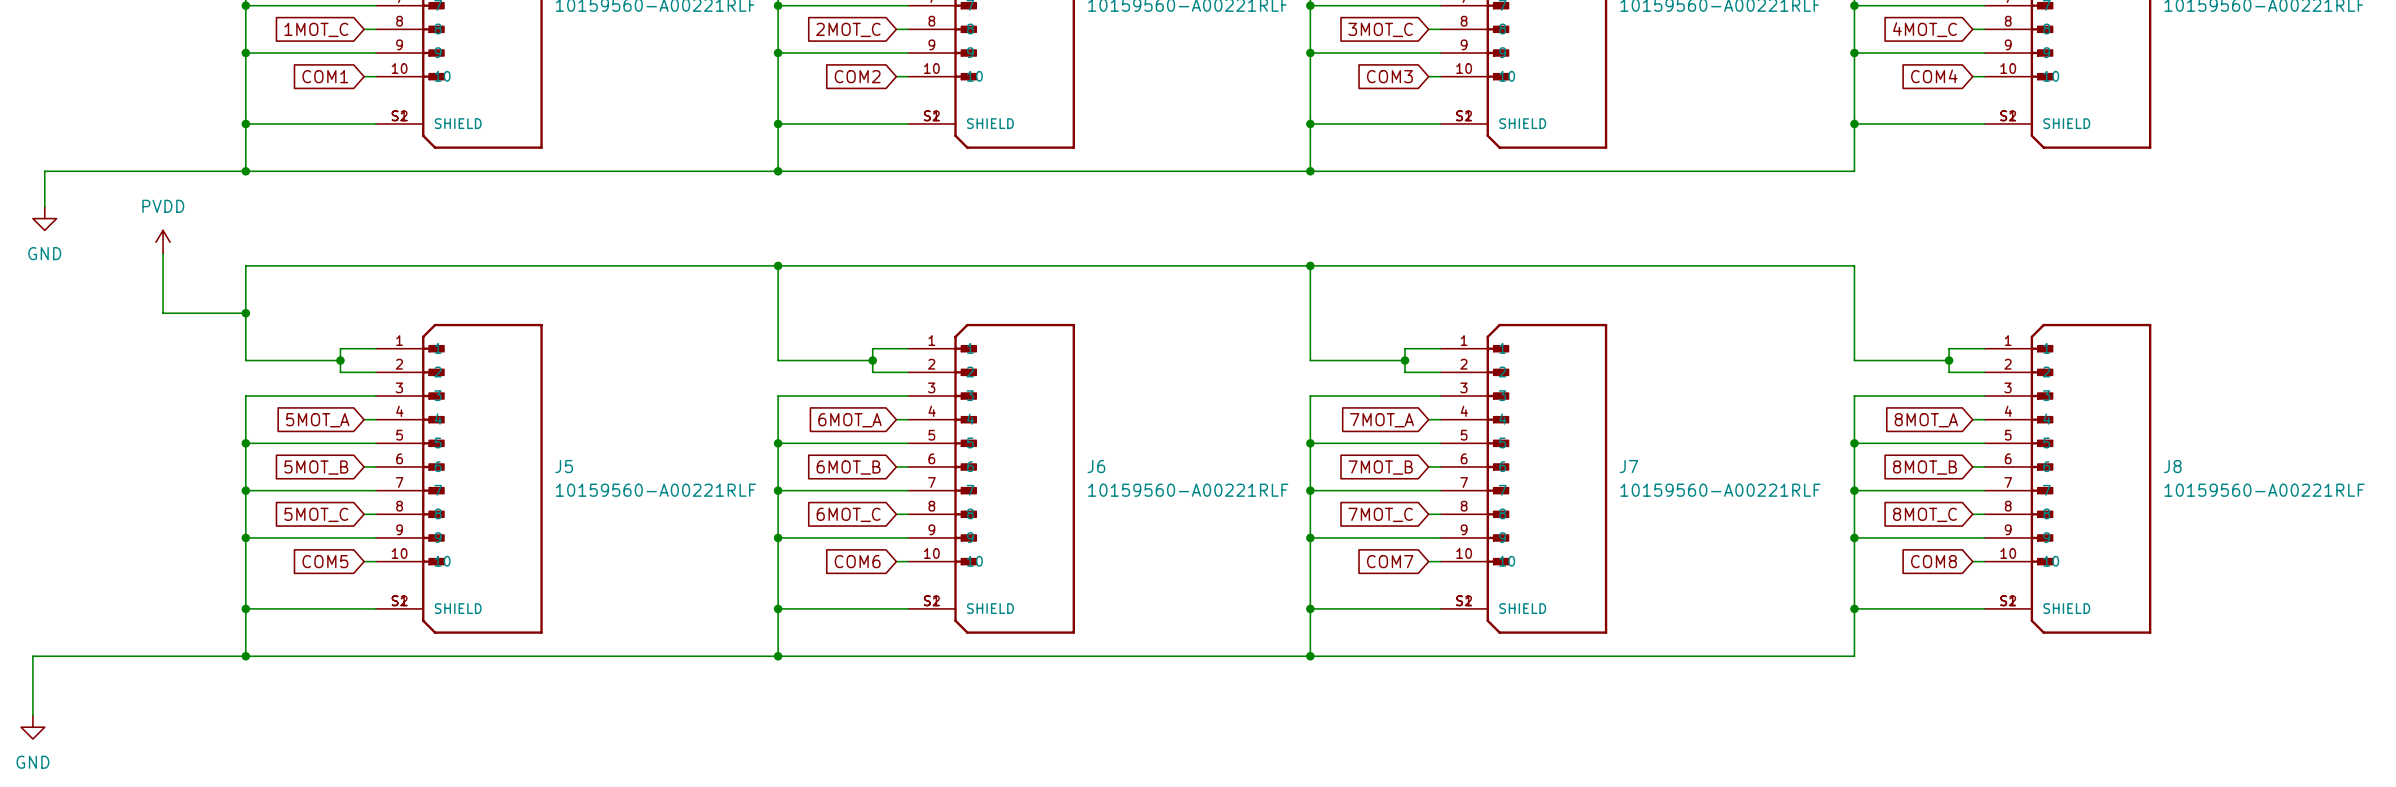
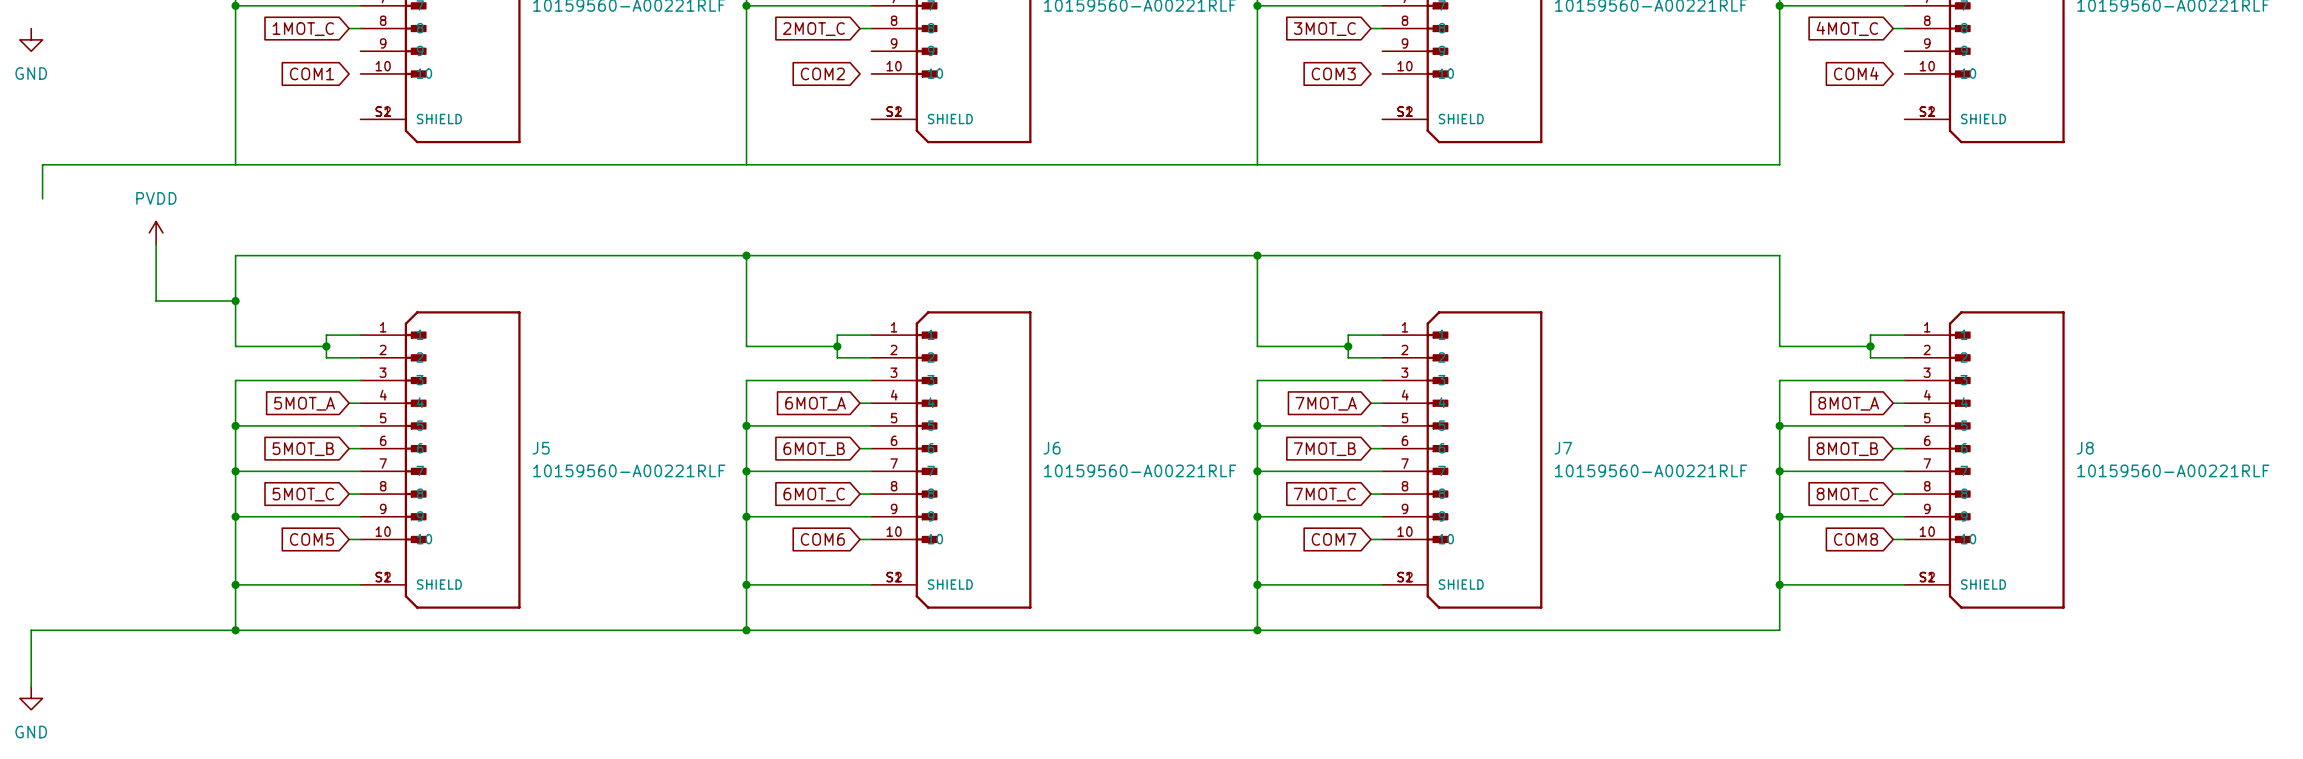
wire: (245, 53) (375, 53) -> none
junction: (245, 53) -> none
wire: (778, 53) (908, 53) -> none
junction: (778, 53) -> none
wire: (1310, 53) (1440, 53) -> none
junction: (1310, 53) -> none
wire: (1854, 53) (1984, 53) -> none
junction: (1854, 53) -> none
wire: (364, 76) (375, 76) -> none
wire: (896, 76) (908, 76) -> none
wire: (1428, 76) (1440, 76) -> none
wire: (1972, 76) (1984, 76) -> none
wire: (245, 123) (375, 123) -> none
junction: (245, 123) -> none
wire: (778, 123) (908, 123) -> none
junction: (778, 123) -> none
wire: (1310, 123) (1440, 123) -> none
junction: (1310, 123) -> none
wire: (1854, 123) (1984, 123) -> none
junction: (1854, 123) -> none
junction: (245, 171) -> none
junction: (778, 171) -> none
junction: (1310, 171) -> none
power symbol position: GND (44, 218) -> GND (31, 39)

